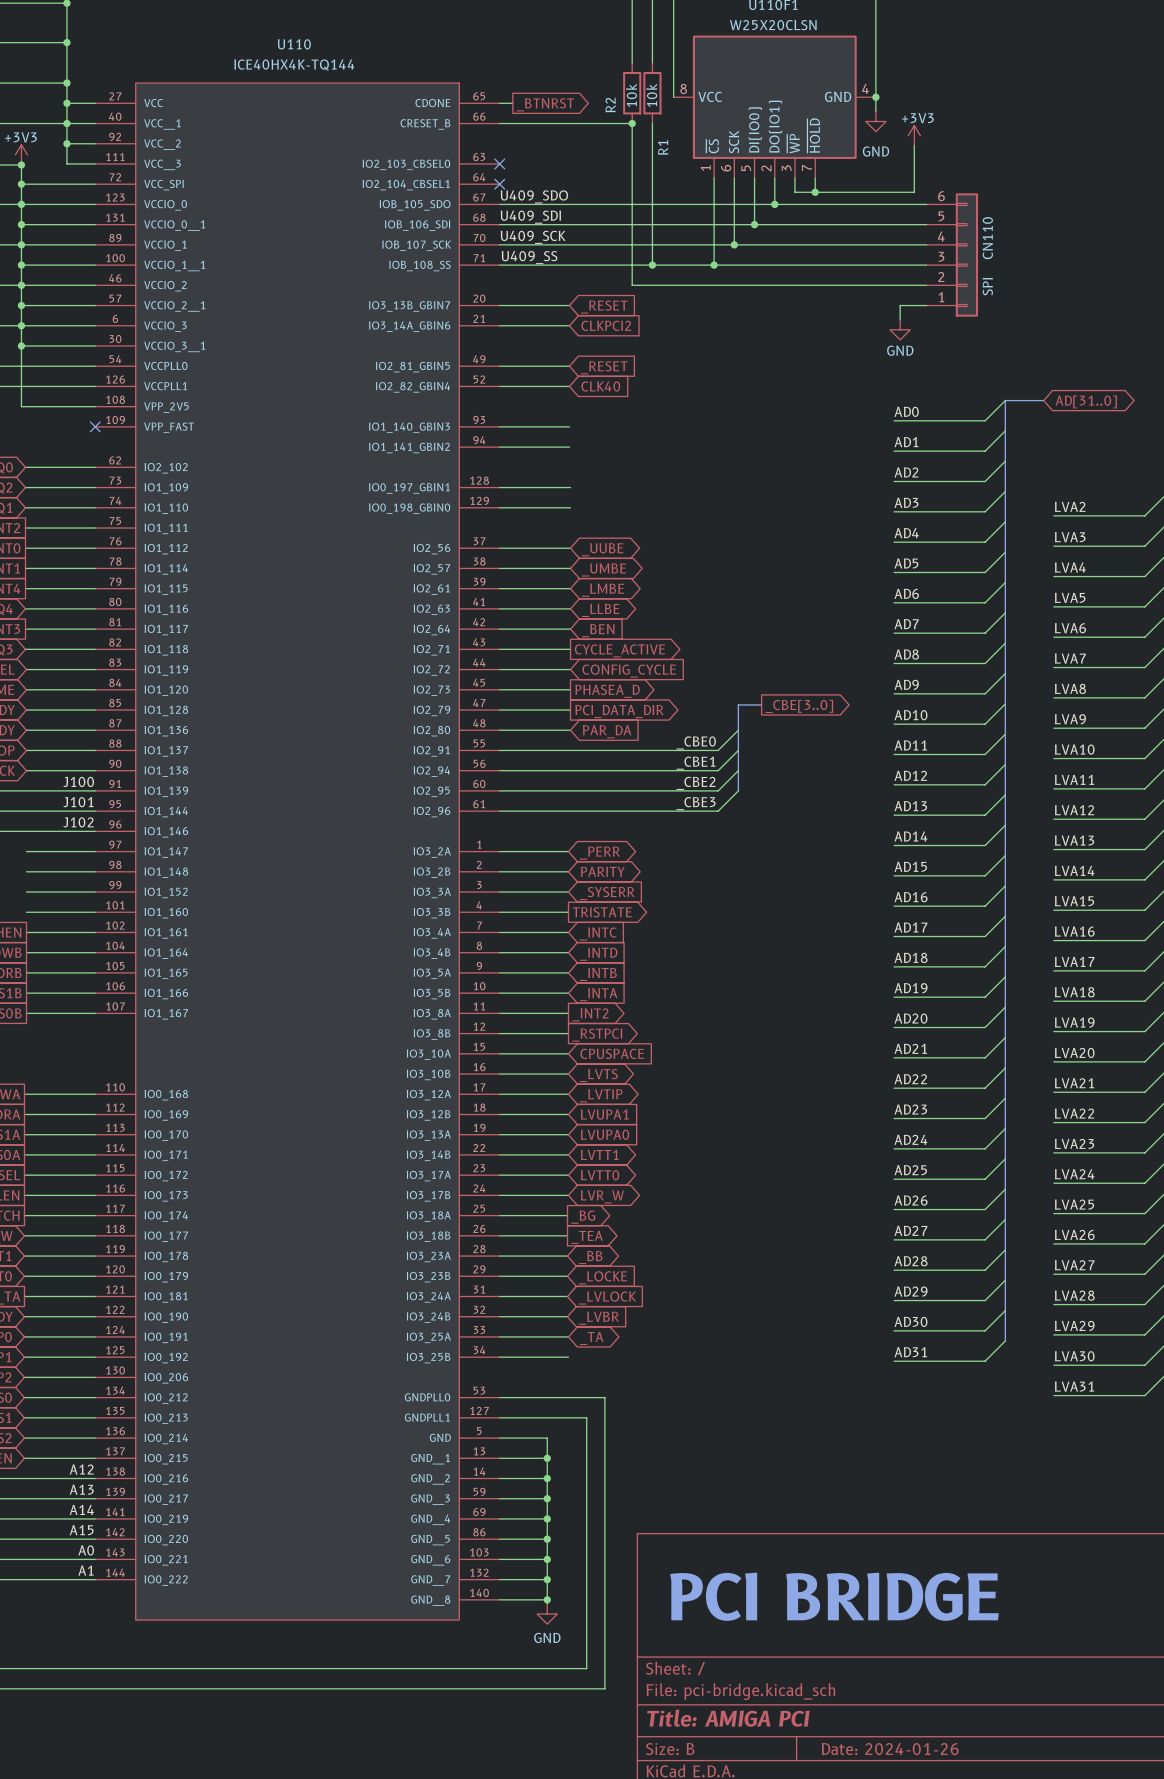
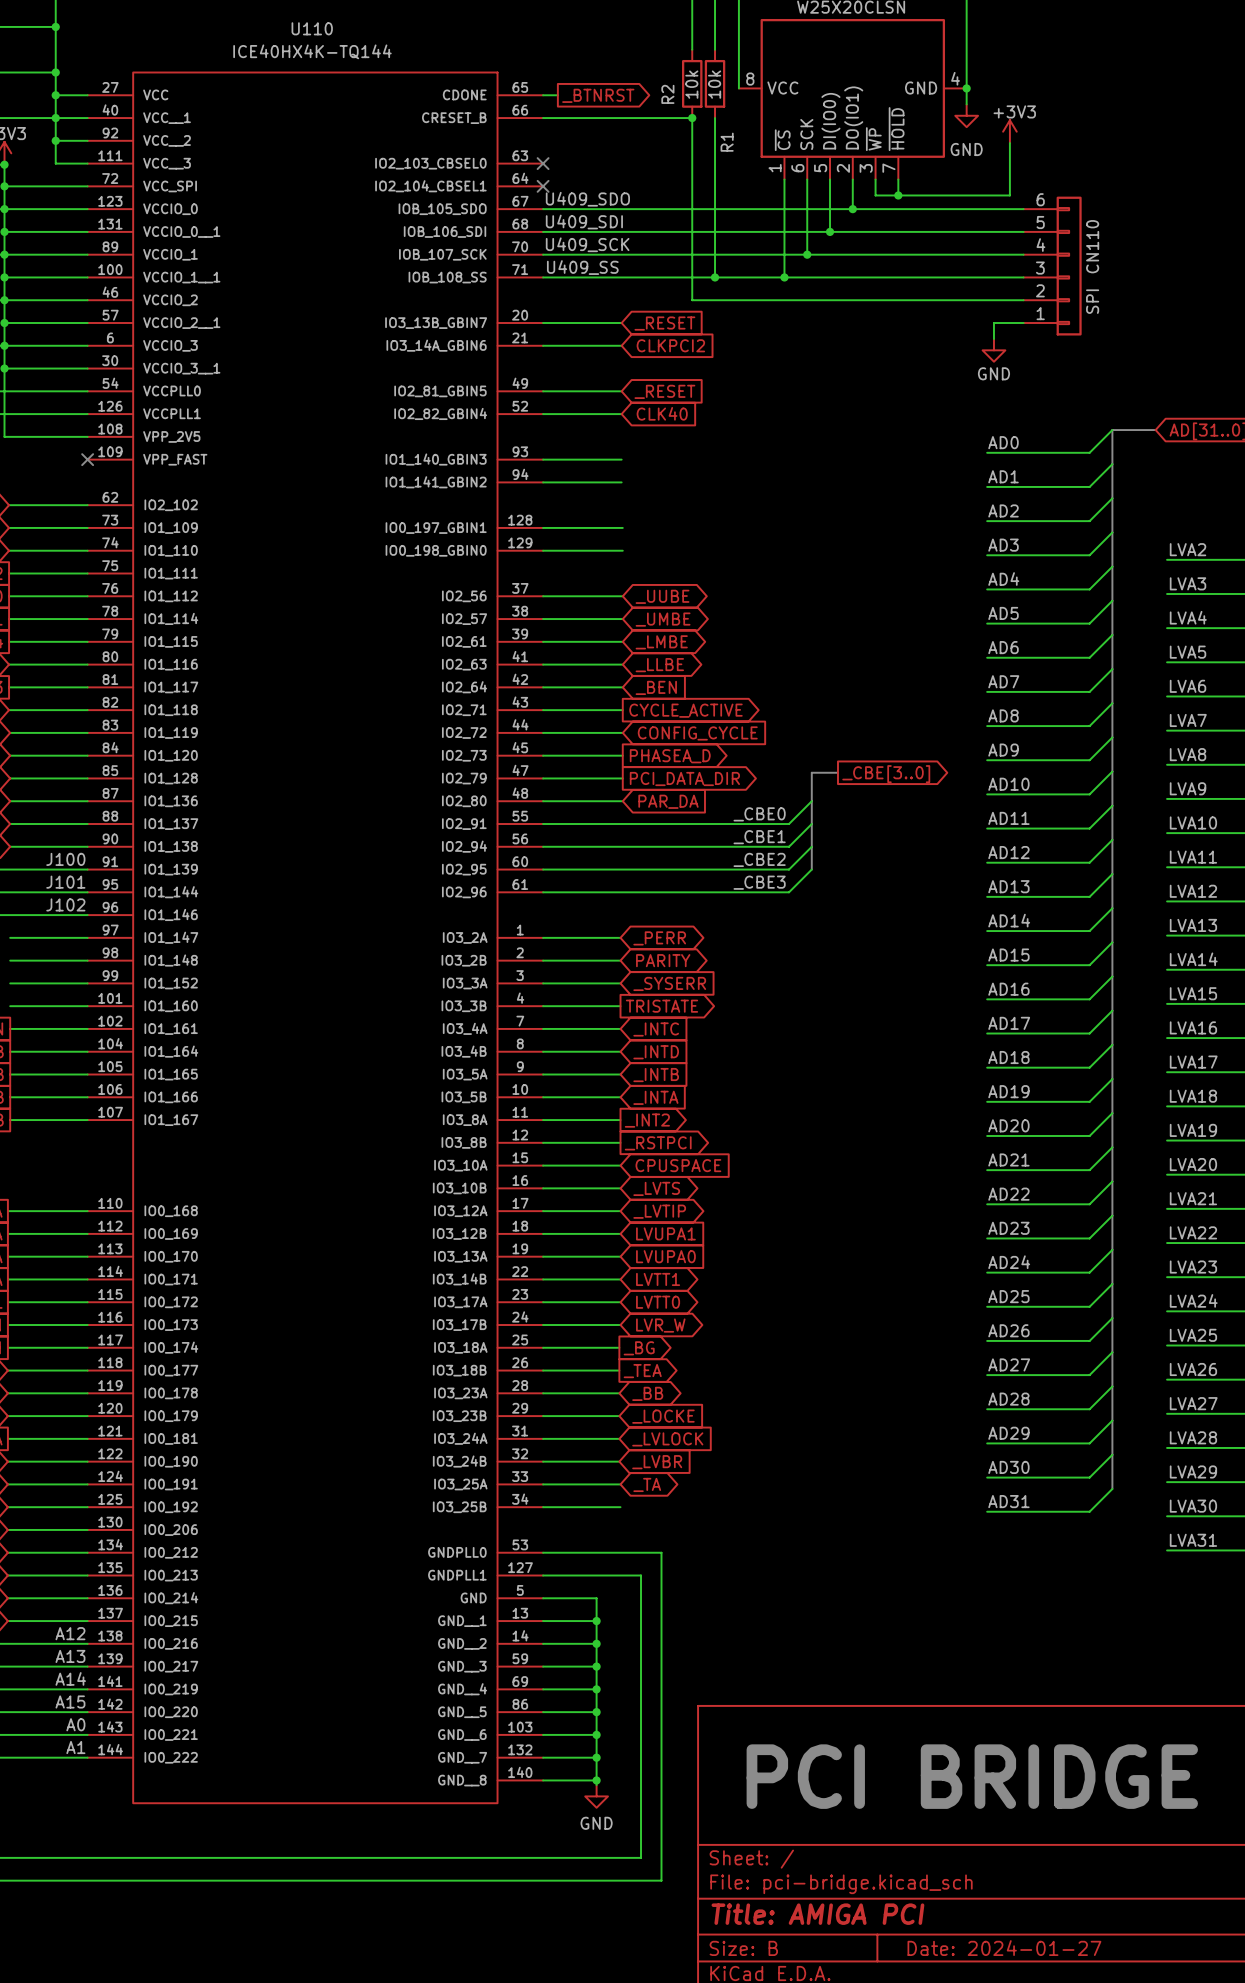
title block: Date: 2024-01-26 (890, 1749) -> Date: 2024-01-27 (1004, 1948)

